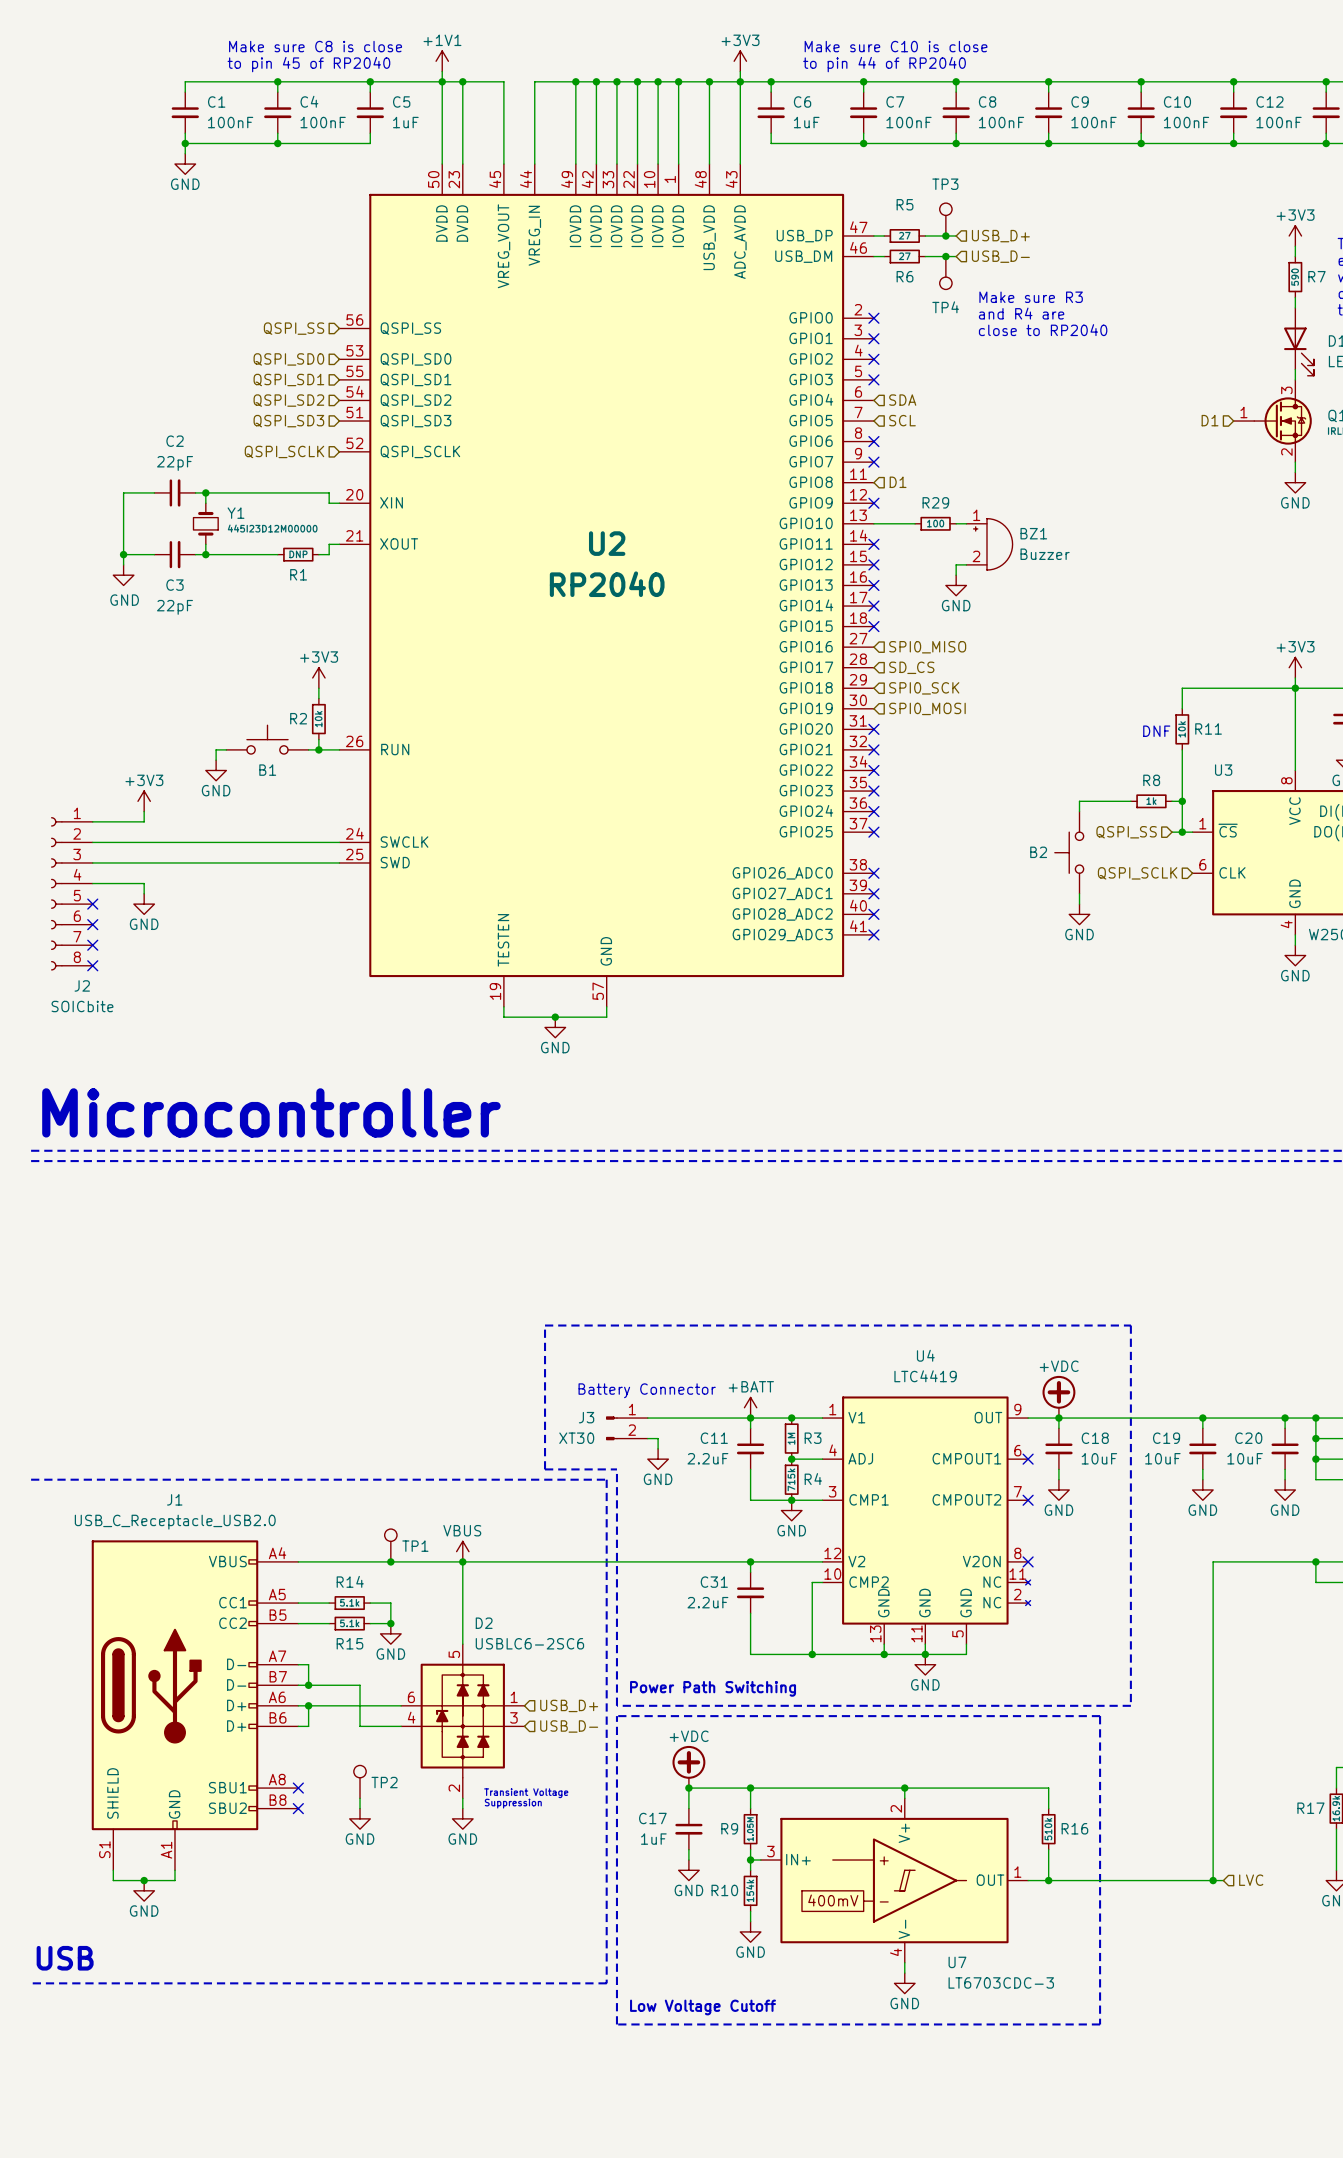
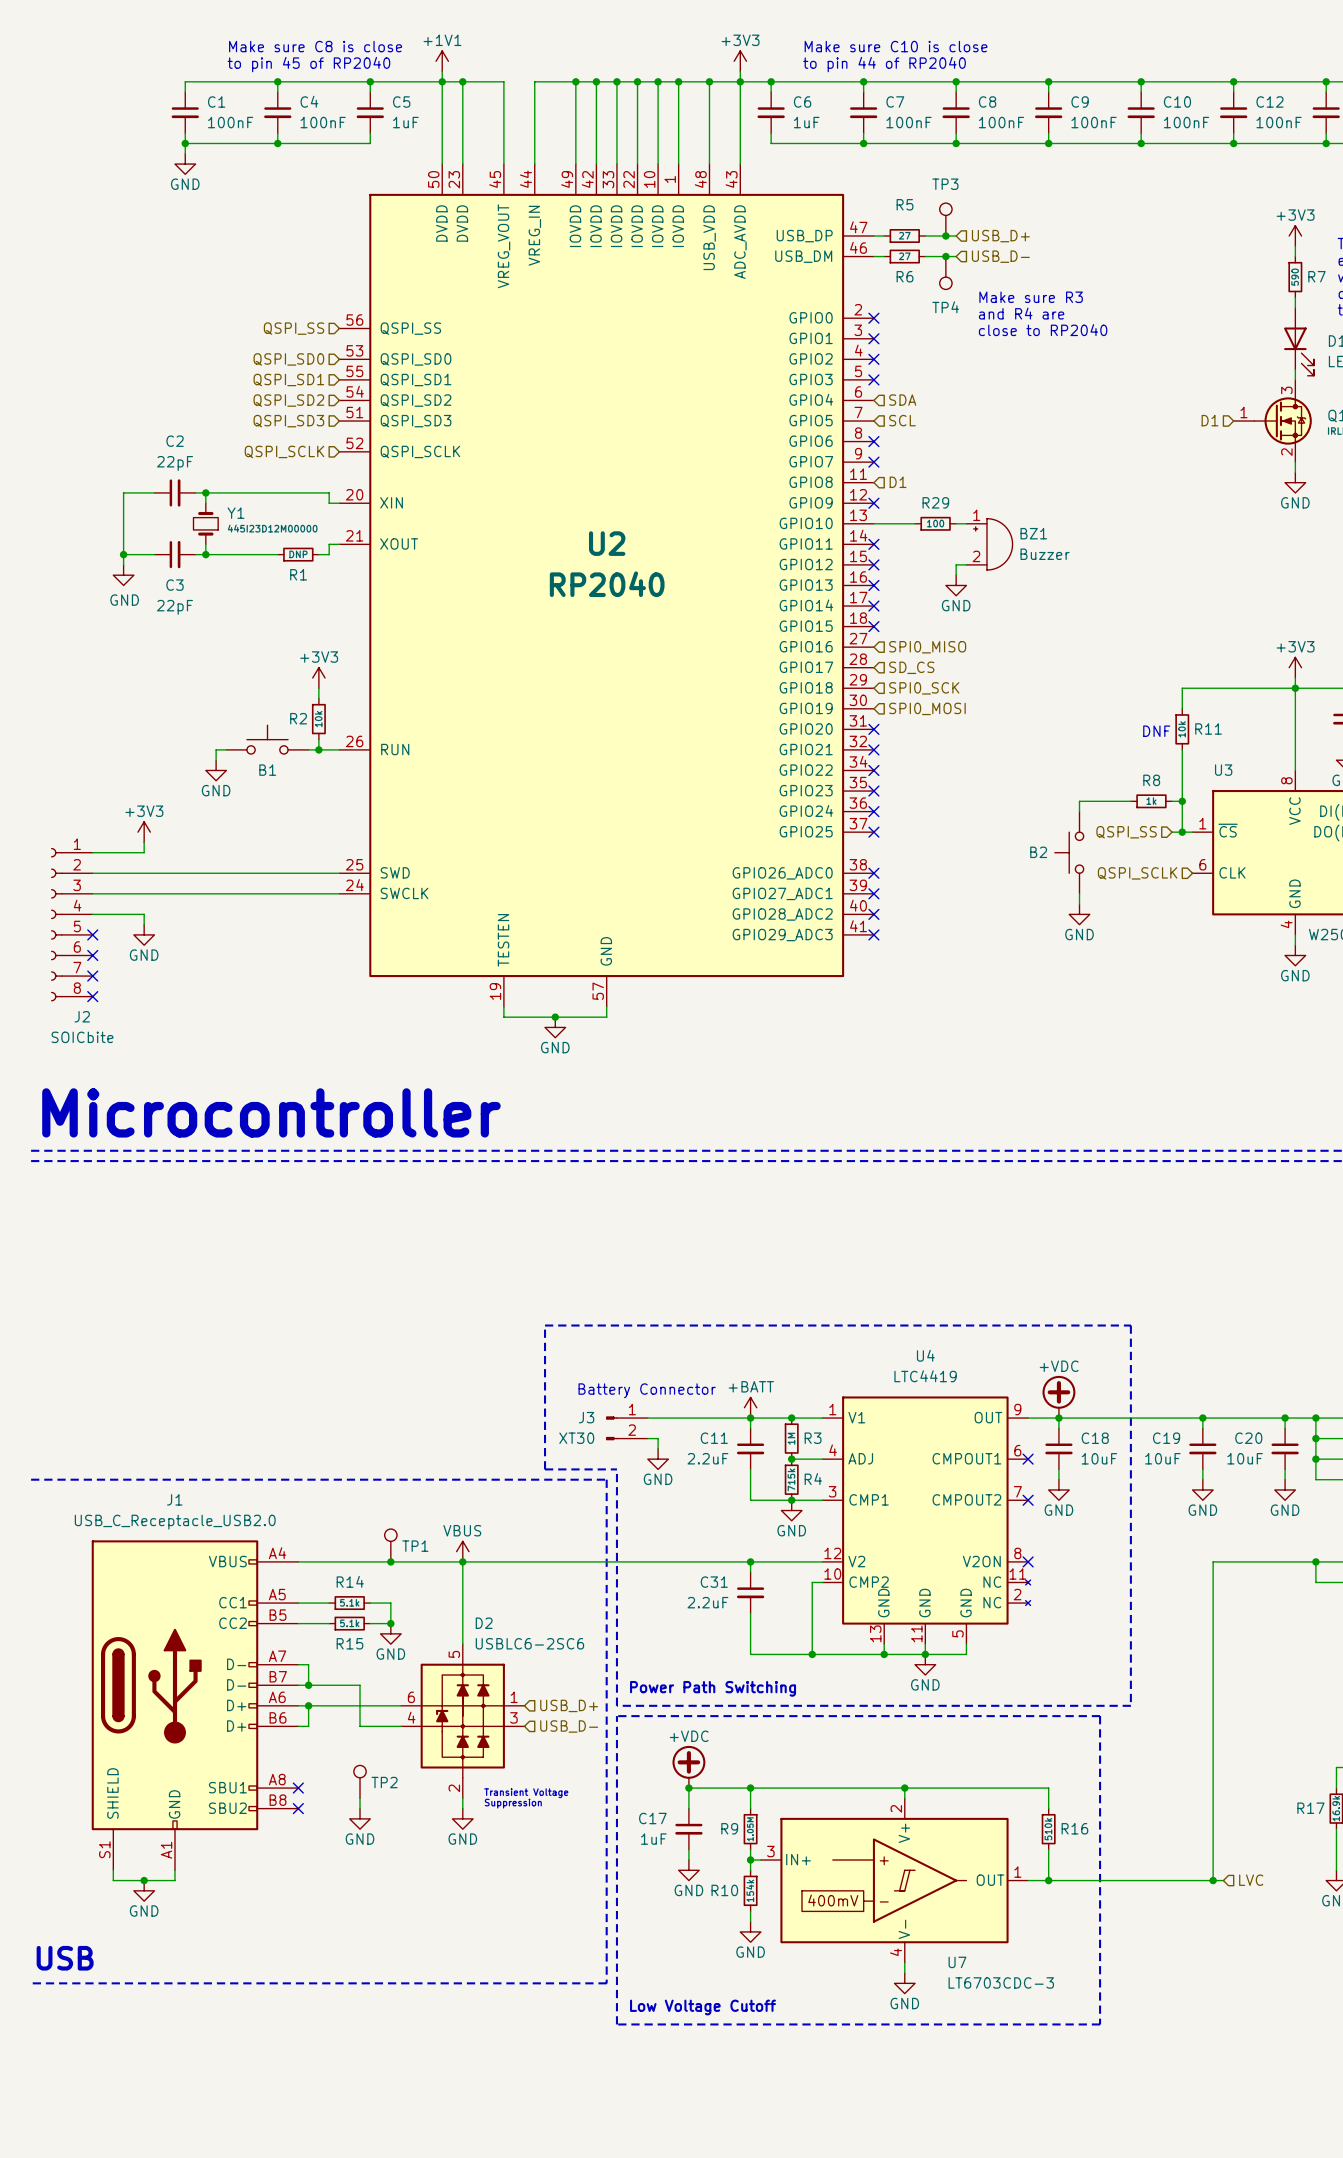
U2 symbol: [339, 164, 874, 1007] -> [339, 164, 874, 1007]
power symbol position: +3V3 (144, 801) -> +3V3 (144, 832)
wire: (144, 811) (144, 821) (92, 821) -> (144, 842) (144, 852) (92, 852)
wire: (92, 842) (339, 842) -> (92, 873) (339, 873)
wire: (92, 862) (339, 862) -> (92, 893) (339, 893)
wire: (92, 883) (144, 883) (144, 893) -> (92, 914) (144, 914) (144, 924)
J2 position: (71, 893) -> (71, 924)
no-connect mark: (92, 904) -> none
power symbol position: GND (144, 904) -> GND (144, 934)
no-connect mark: (92, 924) -> none
no-connect mark: none -> (92, 934)
no-connect mark: (92, 945) -> none
no-connect mark: none -> (92, 955)
no-connect mark: (92, 965) -> none
no-connect mark: none -> (92, 976)
no-connect mark: none -> (92, 996)

